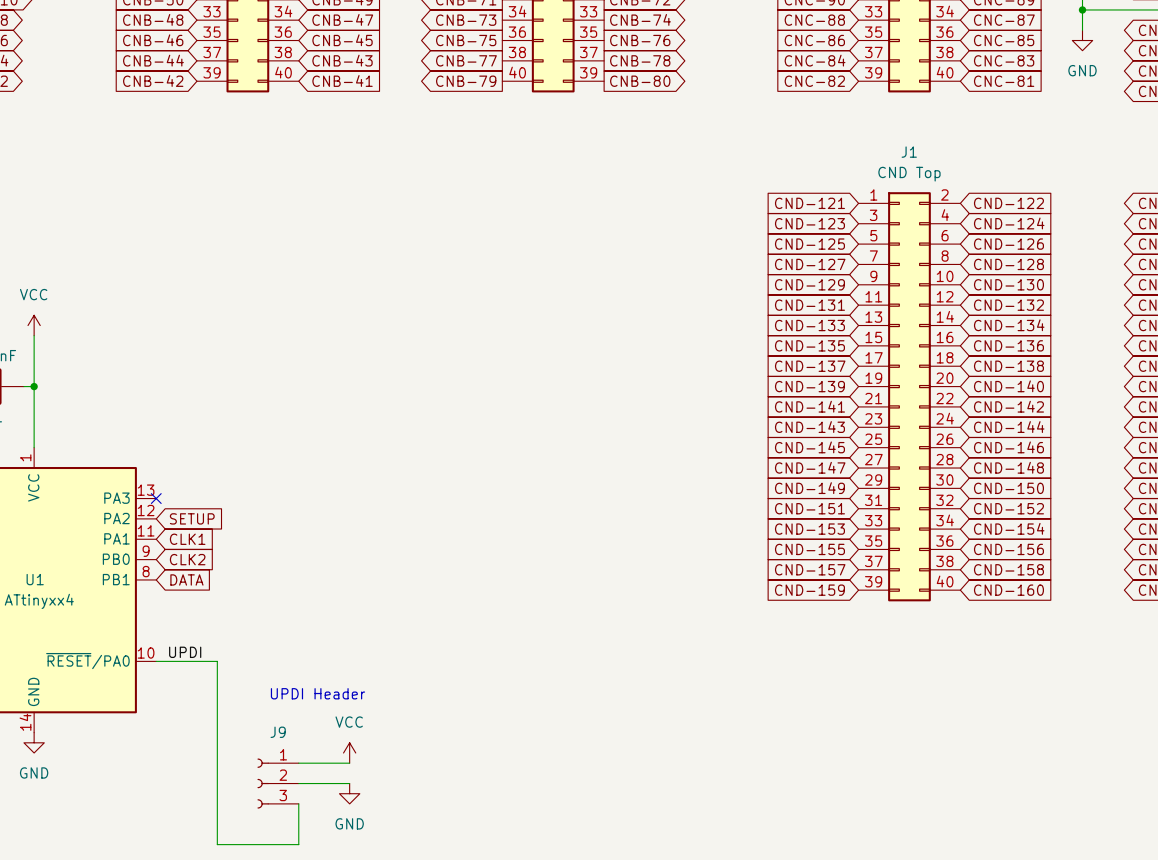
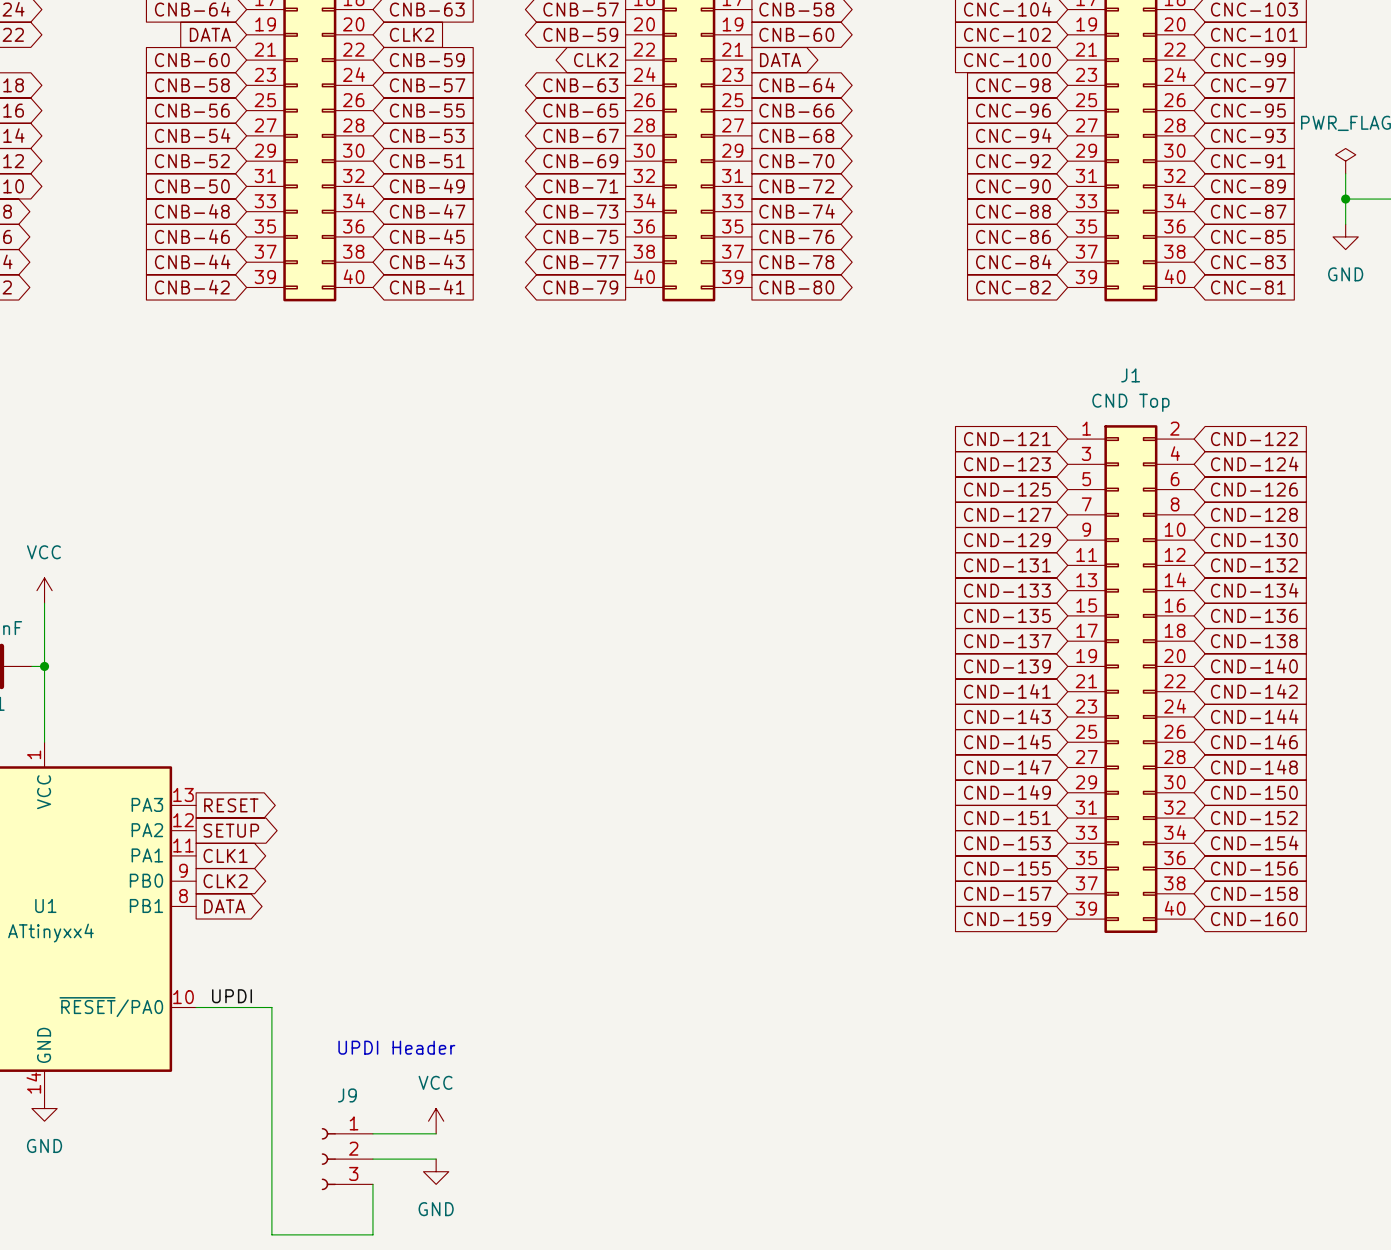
no-connect mark: (156, 498) -> none
global label: none -> RESET (231, 805)
global label shape: input (192, 518) -> output (231, 830)
global label shape: input (187, 539) -> output (225, 855)
global label shape: input (187, 559) -> output (225, 881)
global label shape: input (186, 579) -> output (224, 906)

